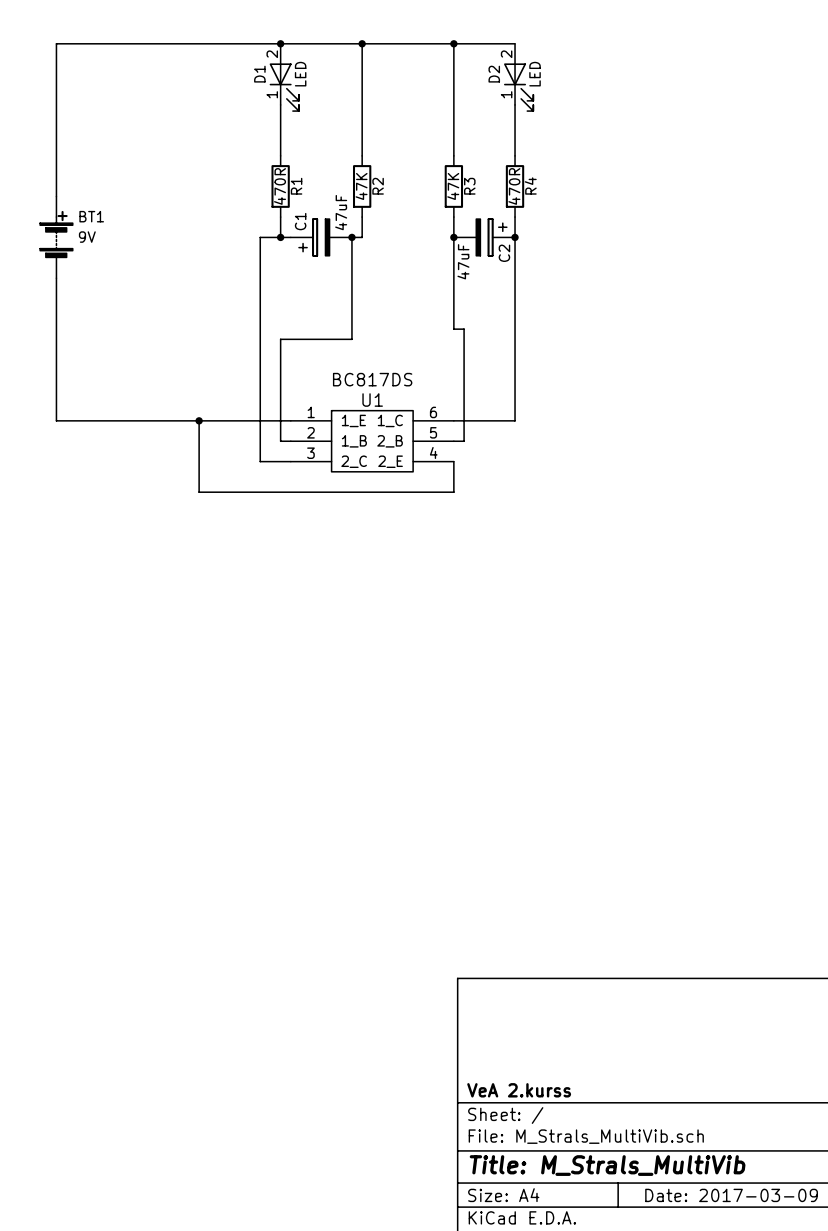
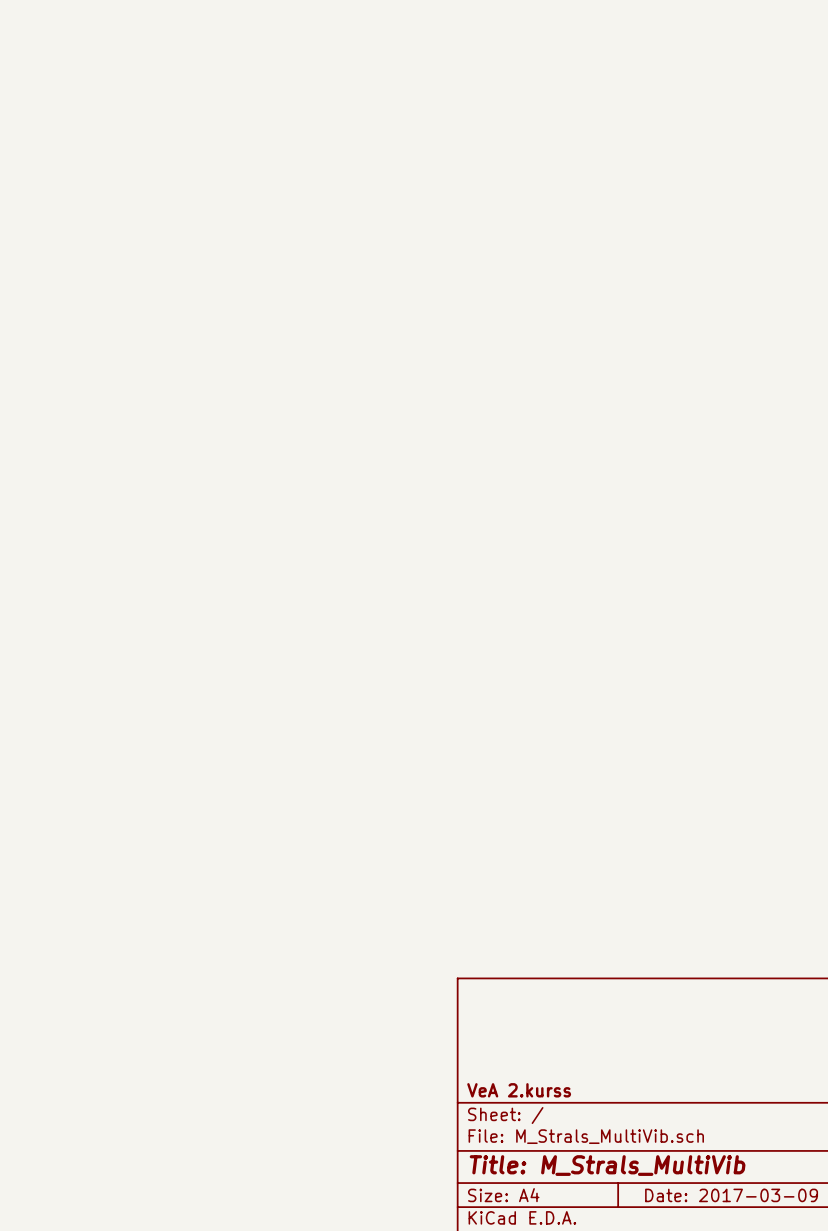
junction: (280, 43) -> none
wire: (362, 43) (362, 155) -> none
junction: (362, 43) -> none
wire: (453, 43) (453, 155) -> none
junction: (453, 43) -> none
wire: (515, 43) (56, 43) (56, 196) -> none
D1: LED (284, 77) -> none
D2: LED (518, 77) -> none
wire: (280, 104) (280, 155) -> none
wire: (515, 104) (515, 155) -> none
R1: 470R (280, 186) -> none
R2: 47K (362, 186) -> none
R3: 47K (453, 186) -> none
R4: 470R (515, 186) -> none
wire: (280, 217) (280, 237) -> none
wire: (362, 217) (362, 237) (351, 237) (351, 339) (280, 339) (280, 441) (290, 441) -> none
wire: (453, 217) (453, 329) (464, 329) (464, 441) (453, 441) -> none
wire: (515, 217) (515, 420) (453, 420) -> none
BT1: 9V (56, 237) -> none
junction: (280, 237) -> none
wire: (290, 237) (260, 237) (260, 461) (290, 461) -> none
C1: 47uF (321, 237) -> none
junction: (351, 237) -> none
junction: (453, 237) -> none
C2: 47uF (484, 237) -> none
junction: (515, 237) -> none
wire: (56, 278) (56, 420) (290, 420) -> none
wire: (199, 420) (199, 492) (453, 492) (453, 461) -> none
junction: (199, 420) -> none
U1: BC817DS (372, 441) -> none

